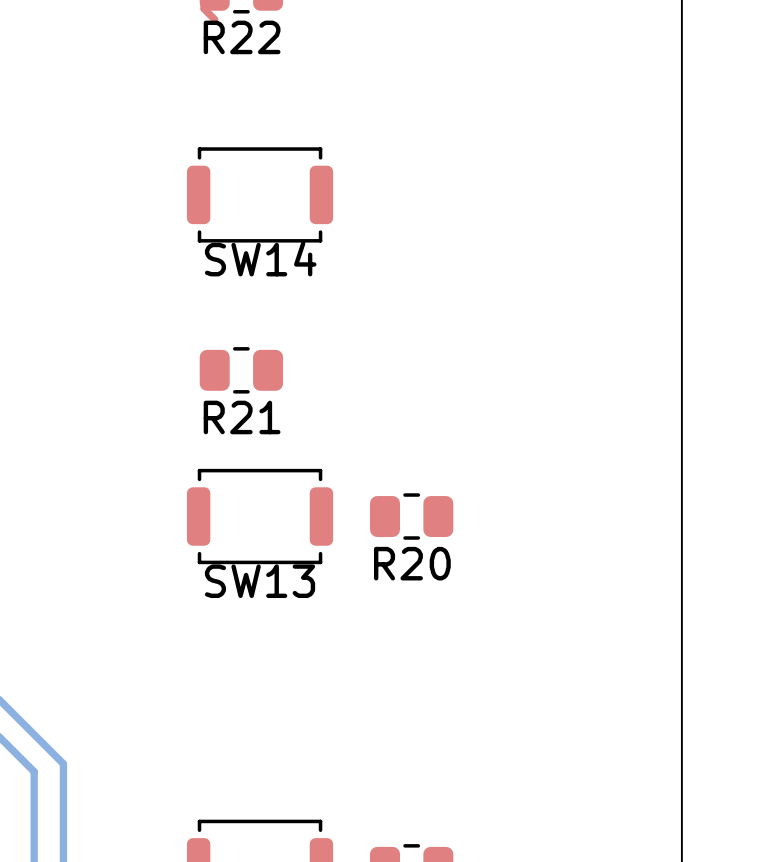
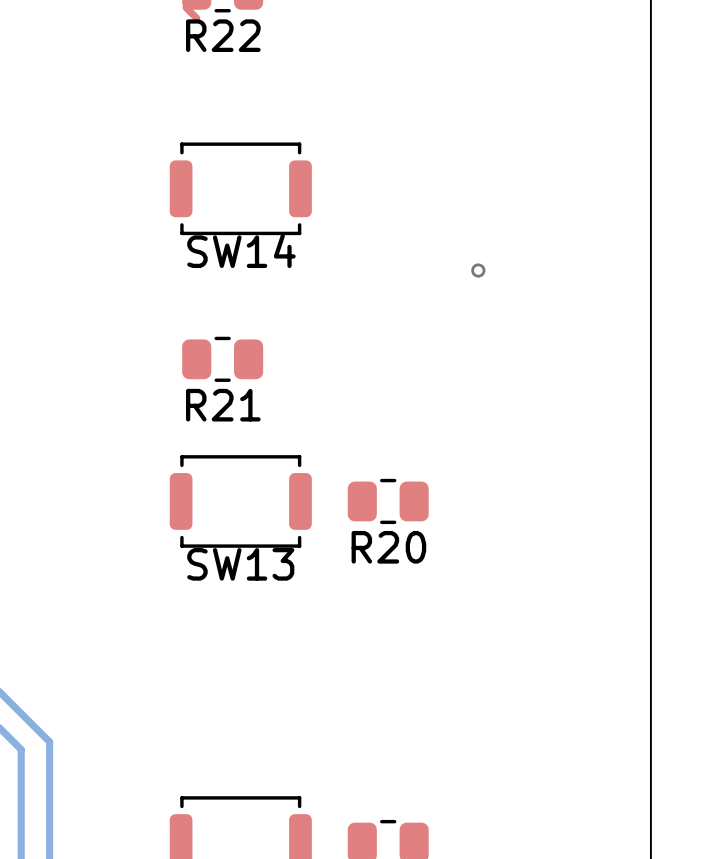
via: none -> (478, 270)

